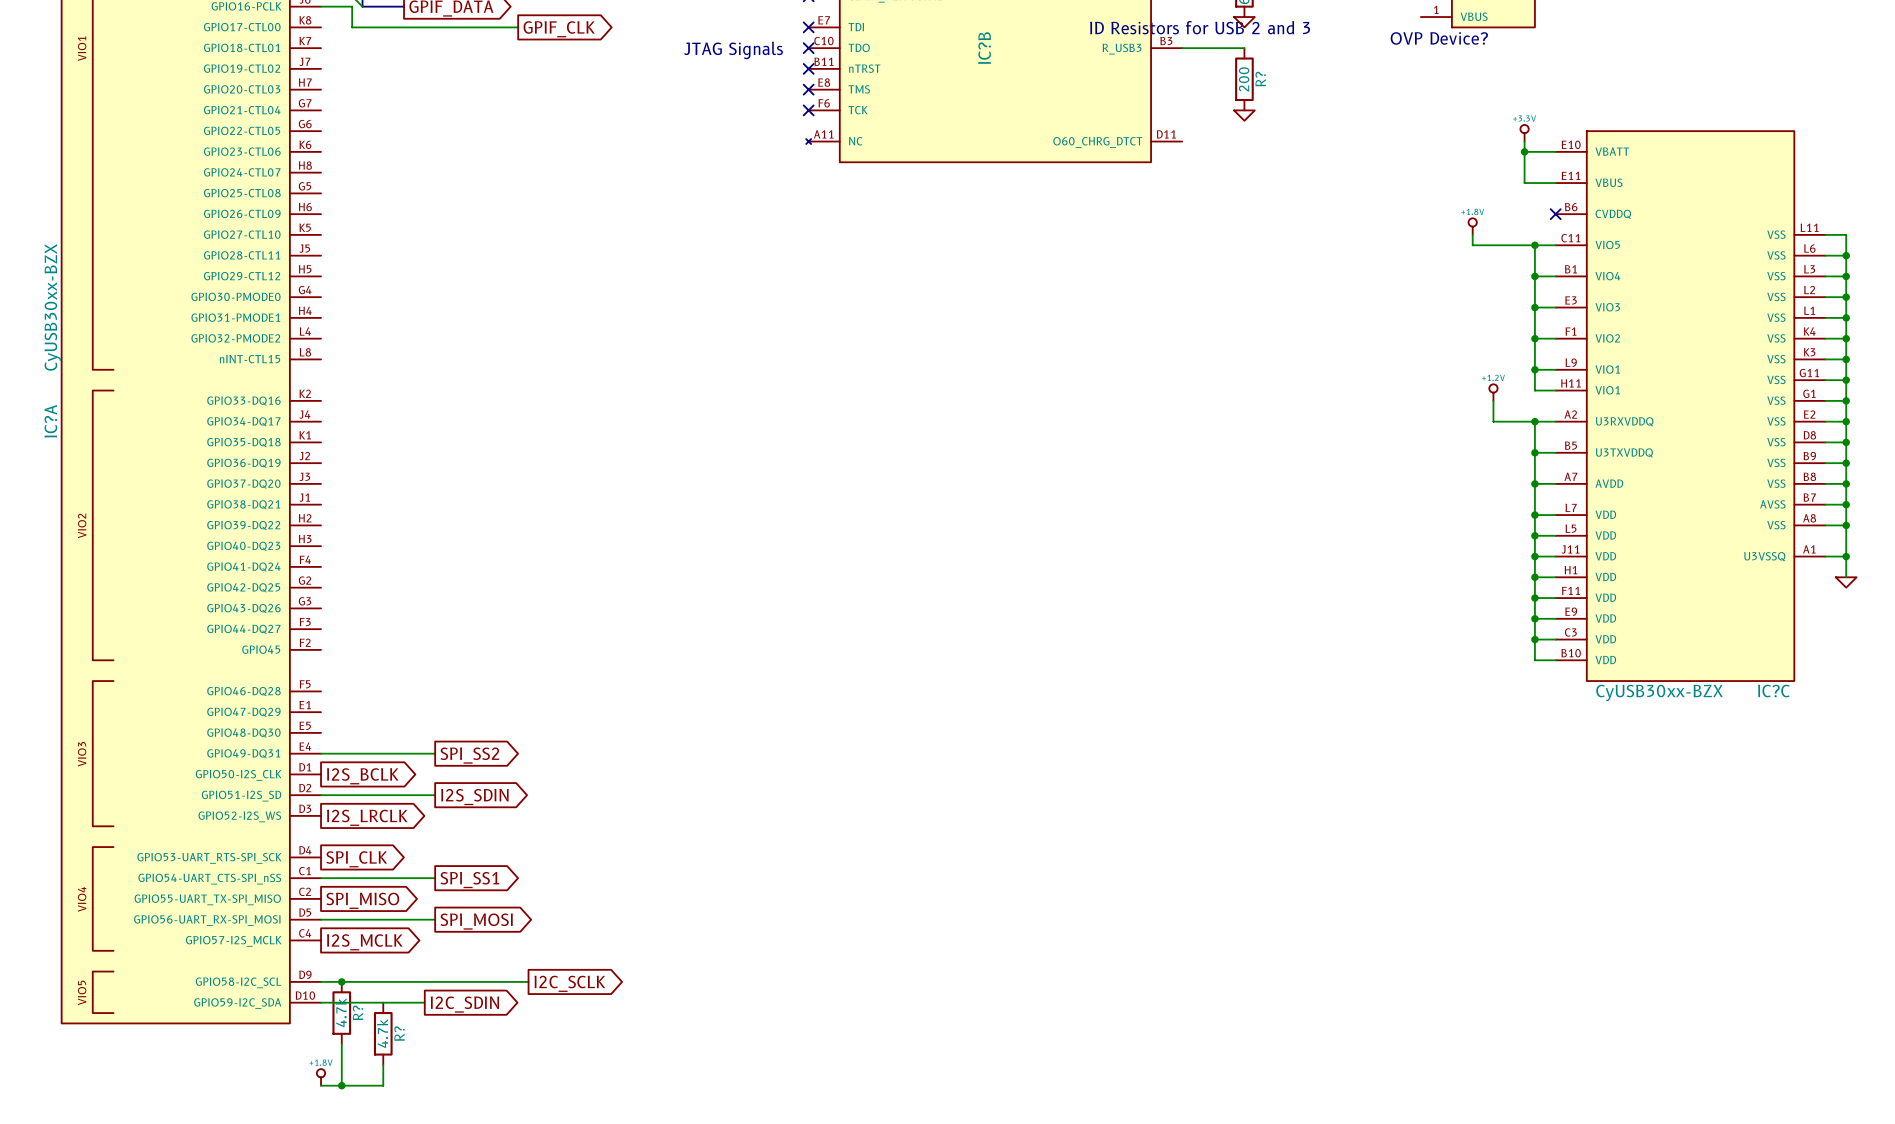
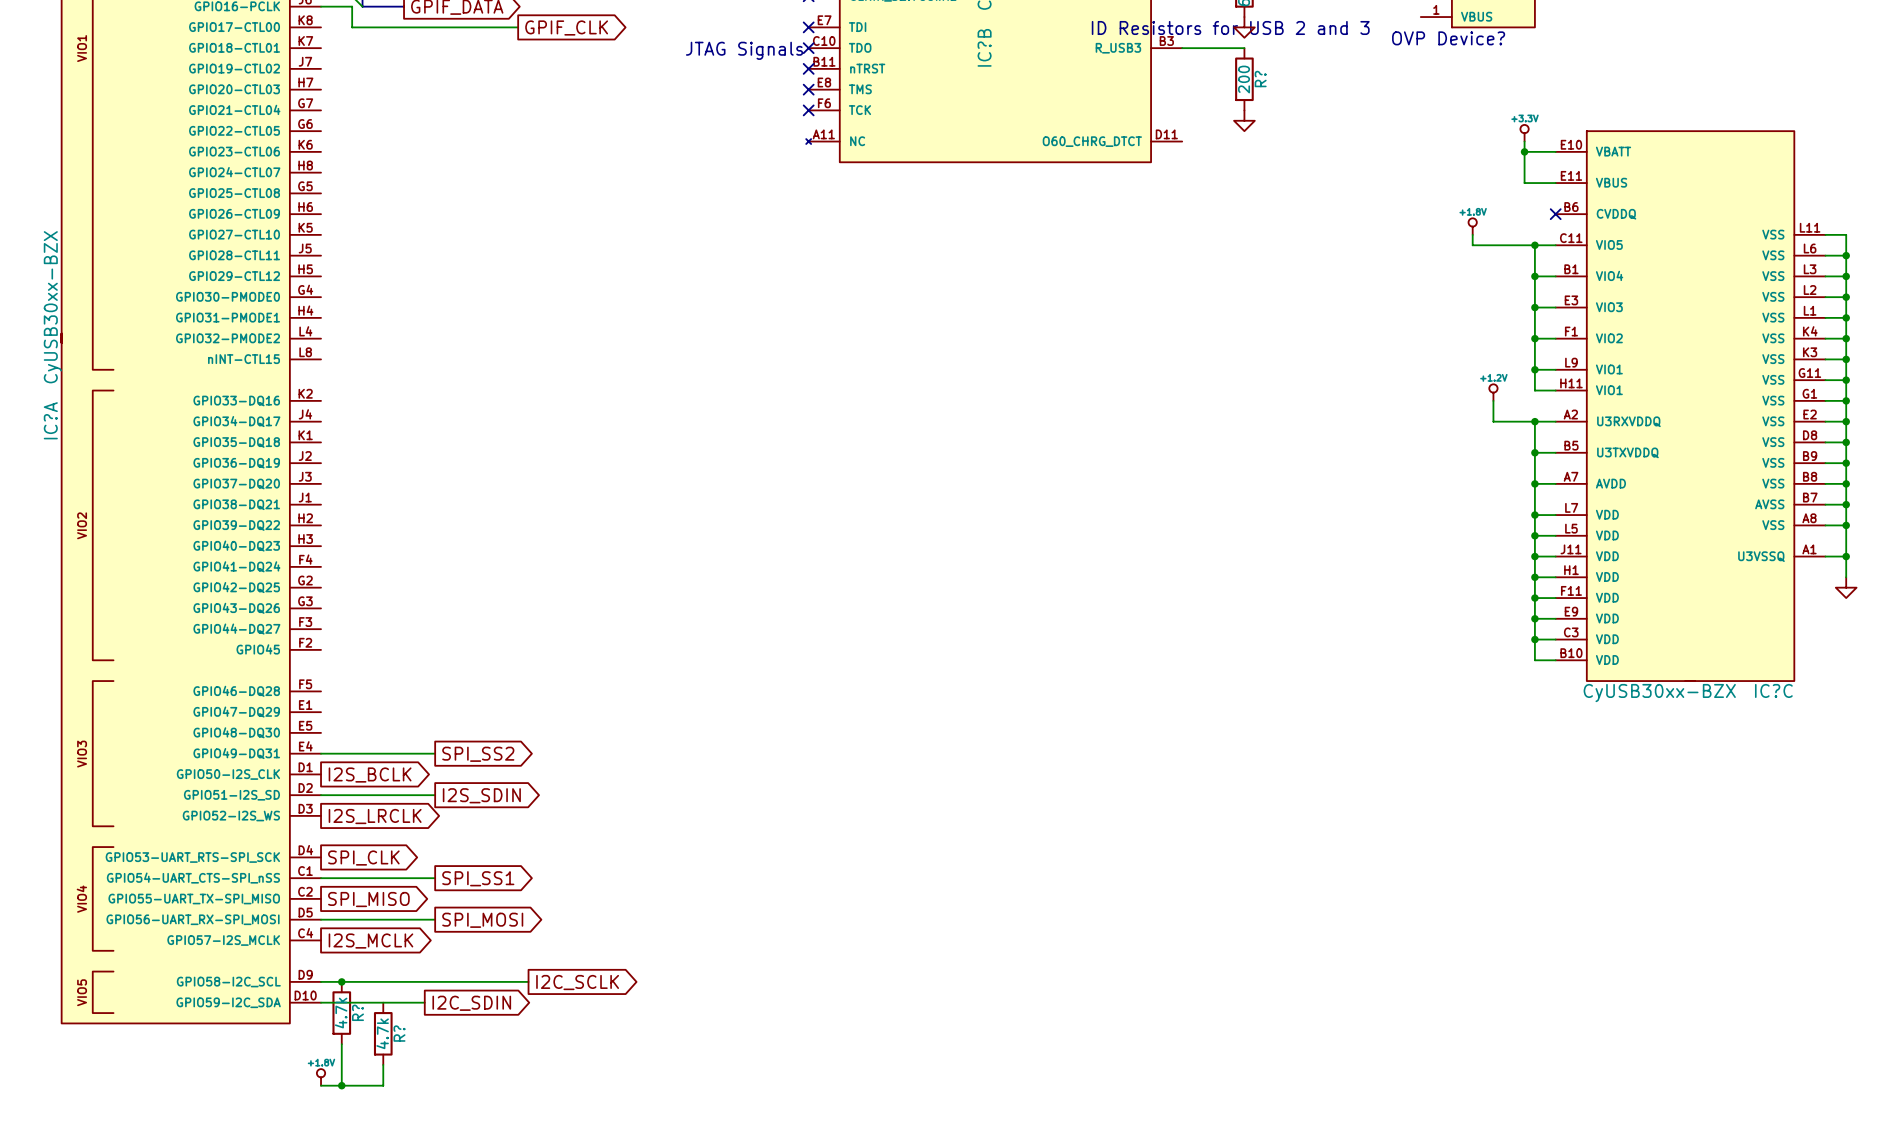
power symbol shape: [1234, 17, 1255, 28] -> [1234, 17, 1255, 38]
power symbol shape: [1234, 110, 1255, 121] -> [1234, 110, 1255, 132]
power symbol shape: [1835, 577, 1857, 588] -> [1835, 577, 1857, 599]

